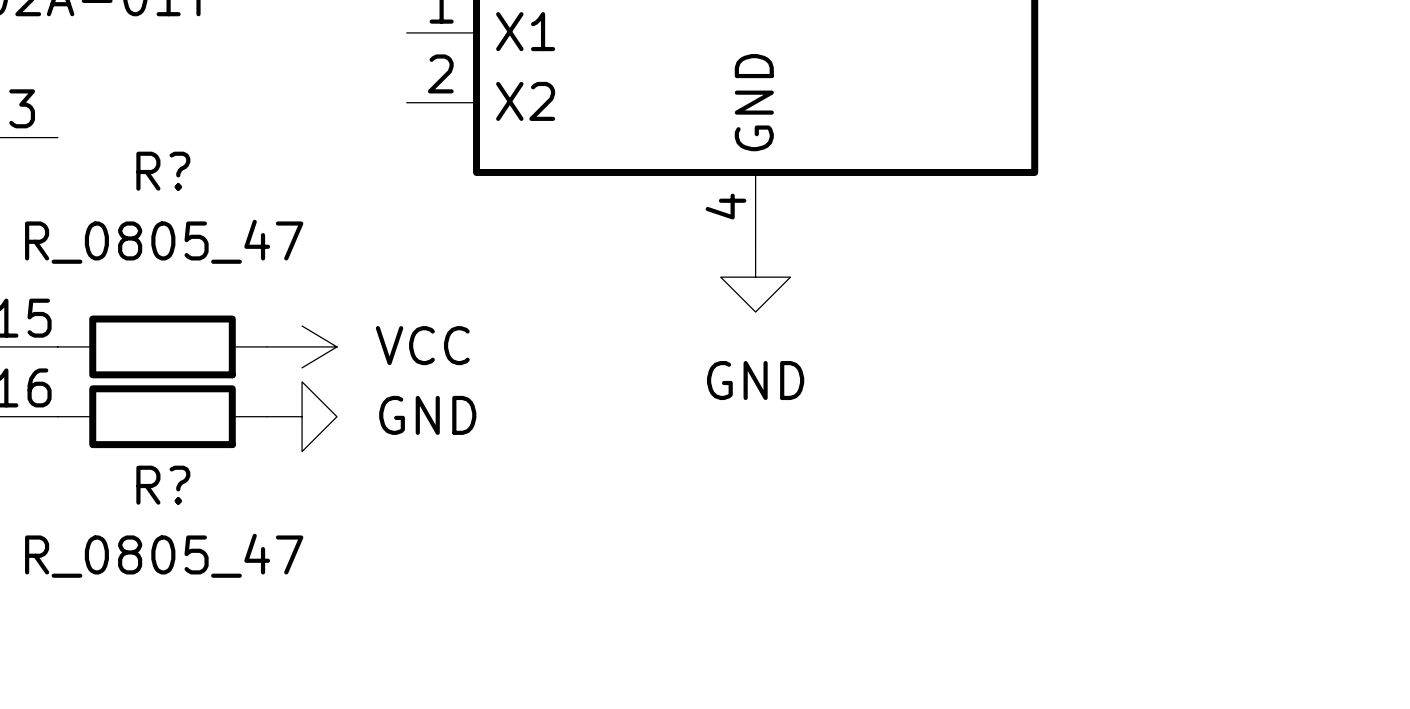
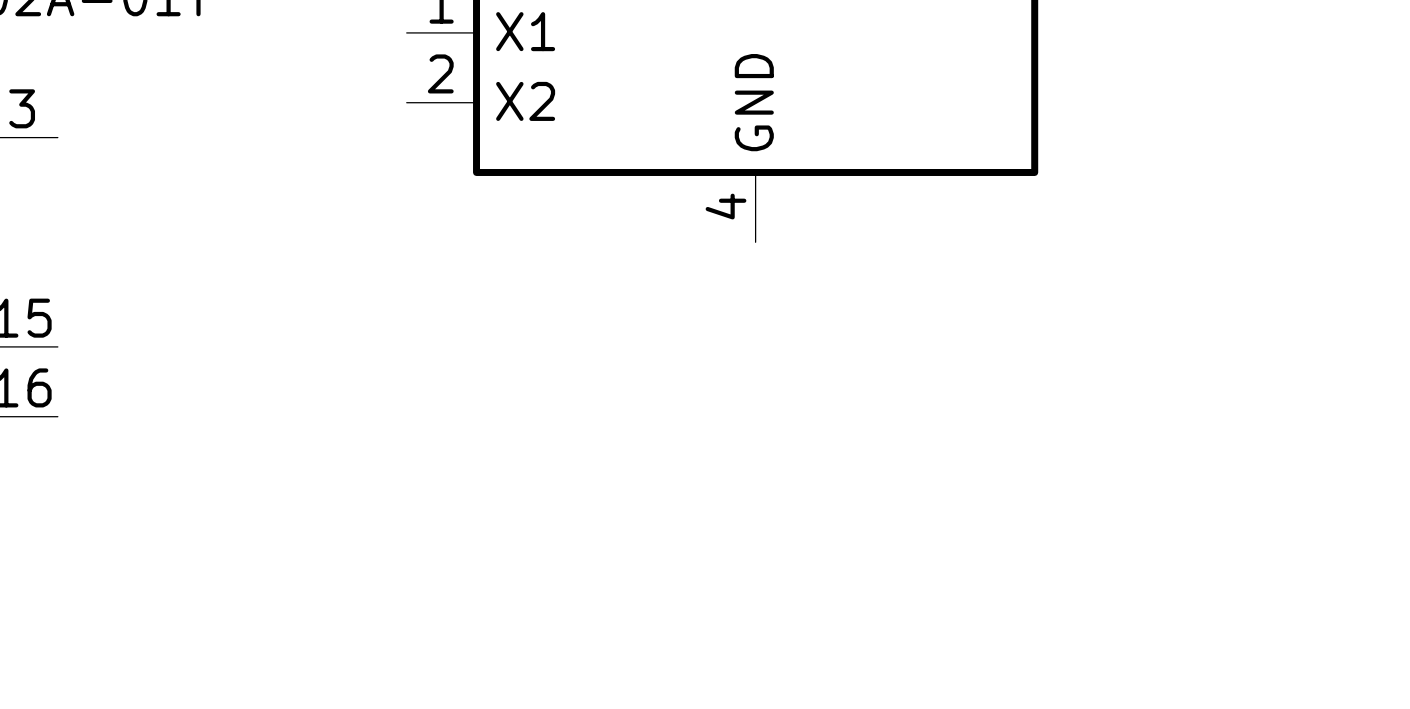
power symbol: GND (755, 277) -> none
R?: R_0805_47 (162, 346) -> none
power symbol: VCC (302, 346) -> none
R?: R_0805_47 (162, 416) -> none
power symbol: GND (302, 416) -> none

